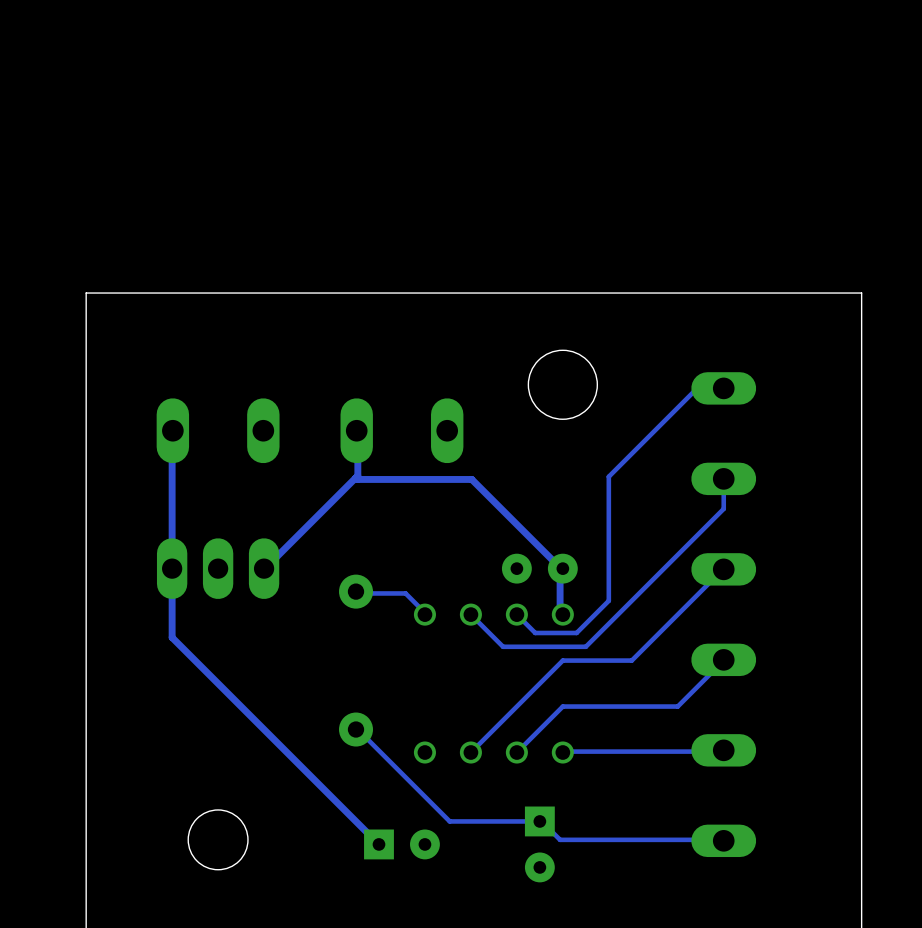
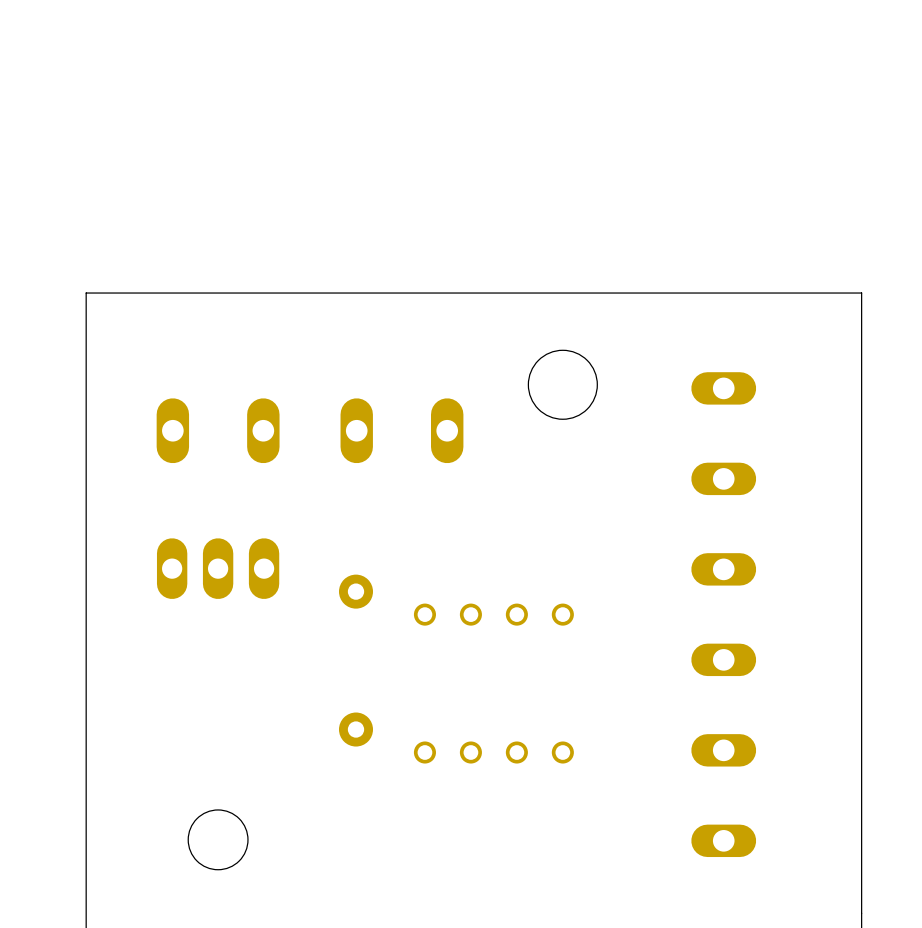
track: (723, 388) (697, 388) (608, 476) (608, 600) (576, 632) (535, 632) (516, 614) -> none
track: (172, 430) (172, 637) (378, 844) -> none
track: (356, 430) (357, 475) (264, 568) -> none
track: (356, 477) (357, 479) (471, 479) (562, 568) (560, 571) (560, 611) (562, 614) -> none
track: (723, 478) (723, 508) (585, 646) (503, 646) (470, 614) -> none
part: (539, 568) -> none
track: (723, 569) (631, 660) (562, 660) (470, 752) -> none
track: (356, 591) (357, 593) (405, 593) (424, 614) -> none
track: (723, 659) (677, 706) (562, 706) (516, 752) -> none
track: (356, 729) (449, 821) (541, 821) (560, 839) (723, 840) -> none
track: (723, 750) (562, 752) -> none
part: (401, 844) -> none
part: (539, 844) -> none

